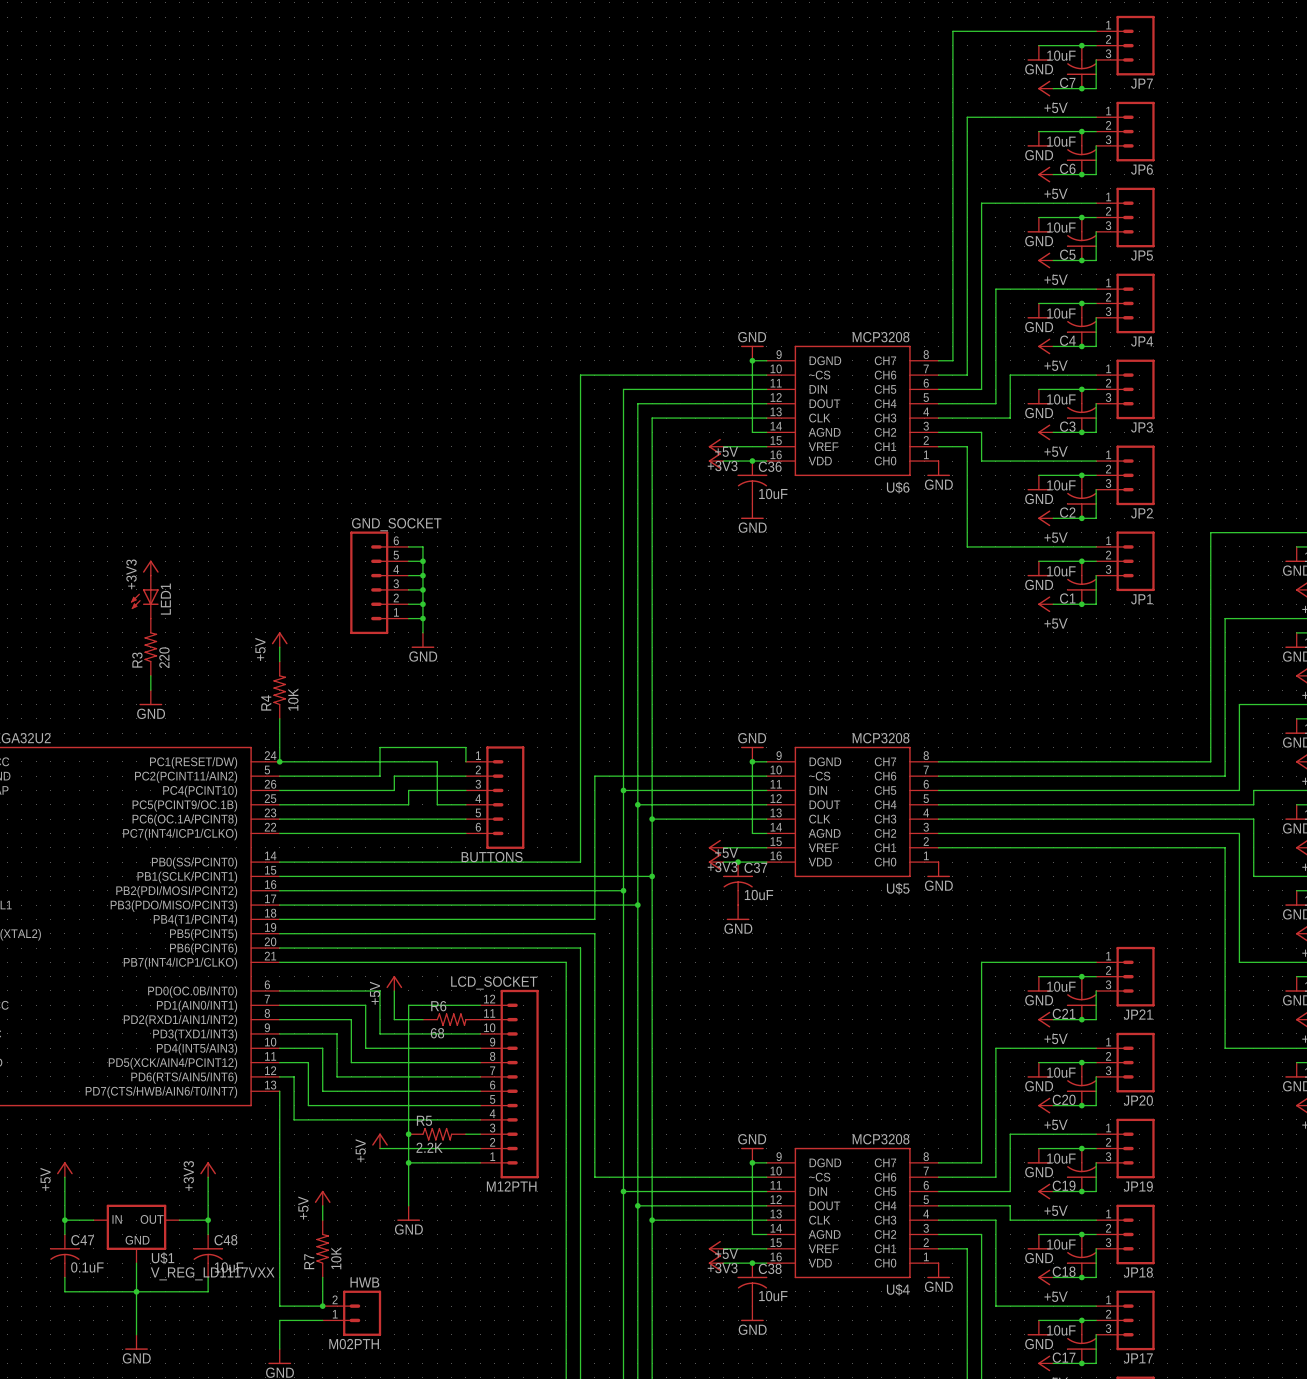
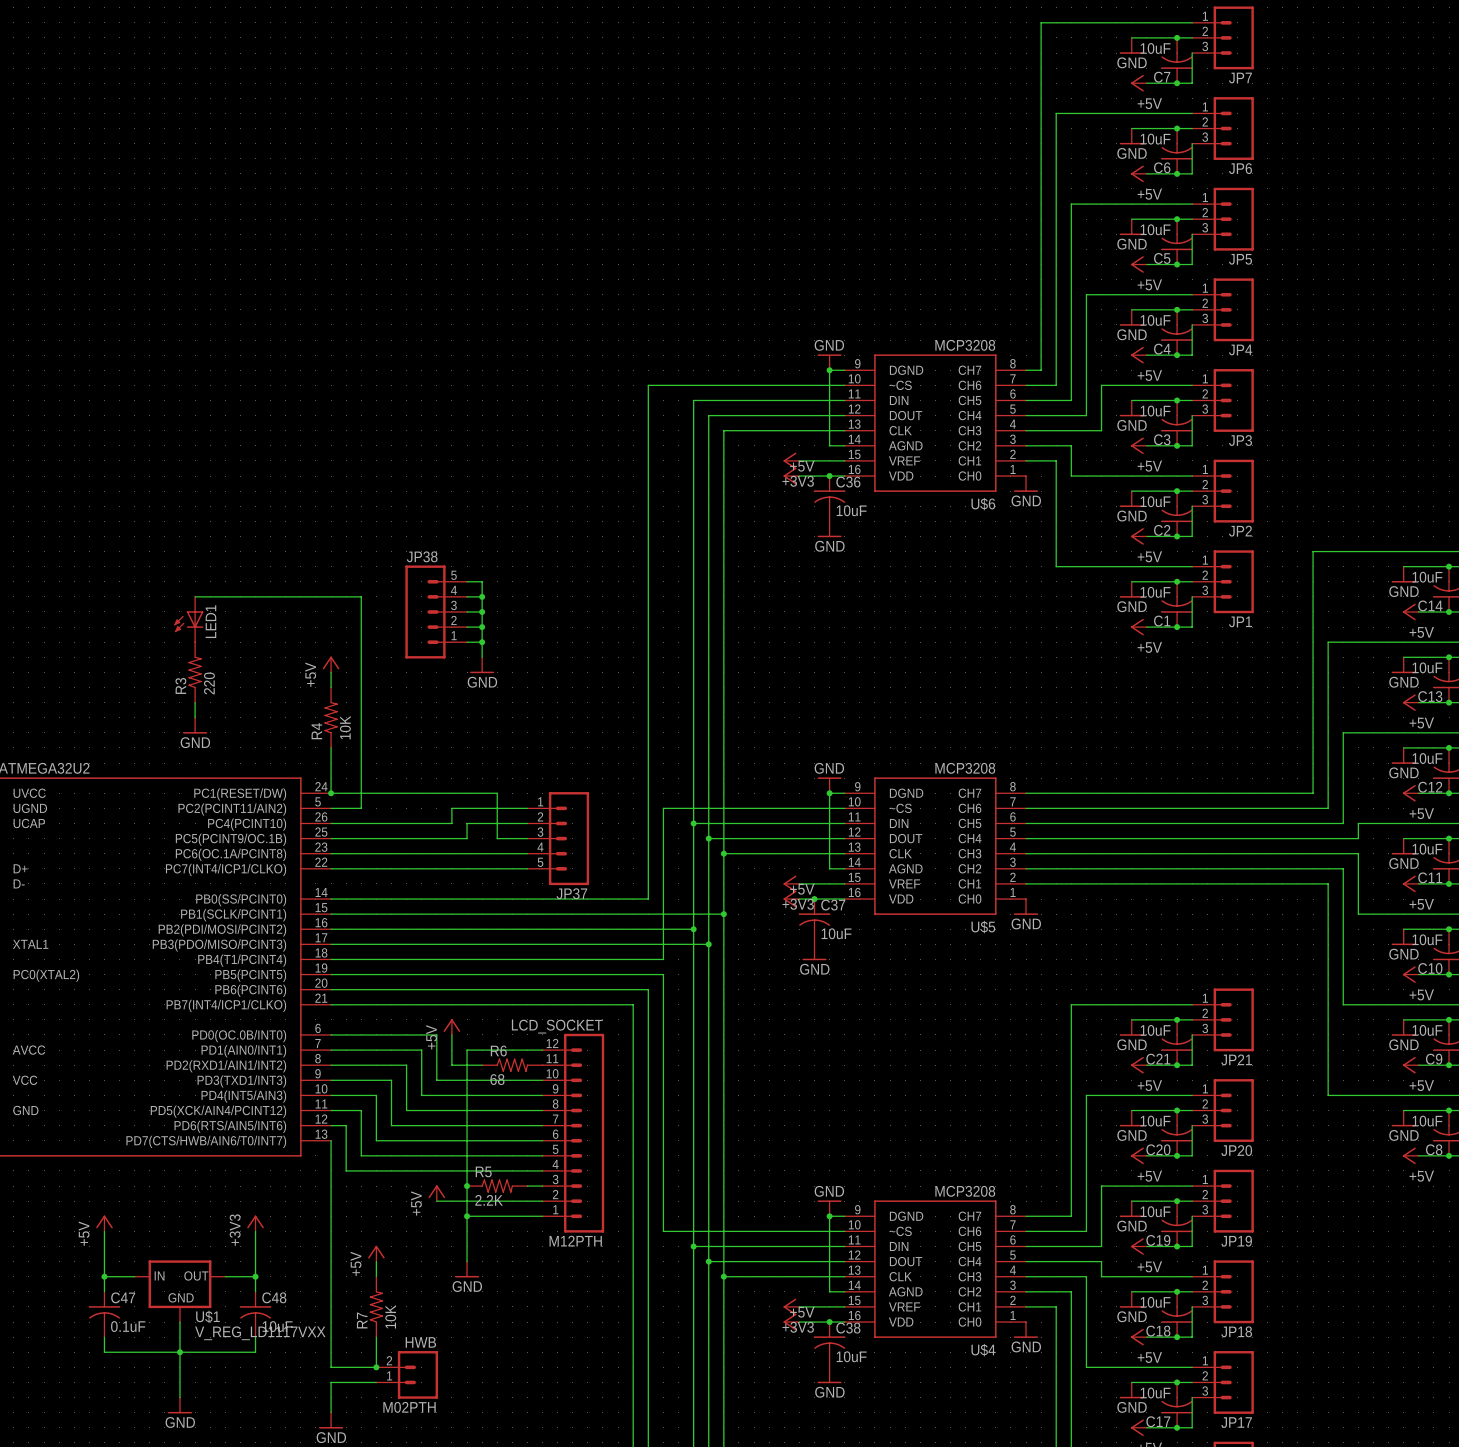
wire: (408, 546) (422, 546) (422, 561) -> none
junction: (422, 561) -> none
power symbol: +3V3 (150, 568) -> none
GND_SOCKET: (379, 582) -> none
JP38: none -> (436, 611)
wire: (465, 761) (465, 747) (380, 747) (380, 776) (308, 776) -> (195, 596) (361, 596) (361, 808)
BUTTONS: (495, 797) -> none
JP37: none -> (558, 838)

